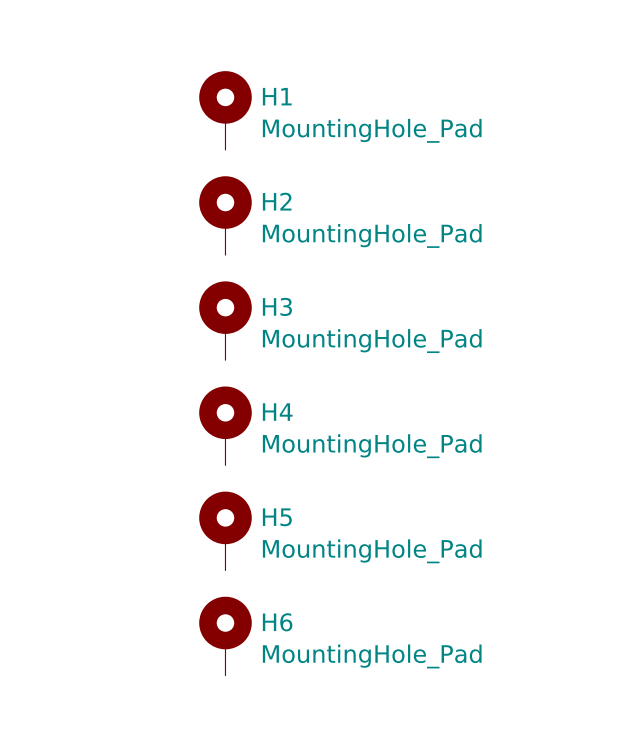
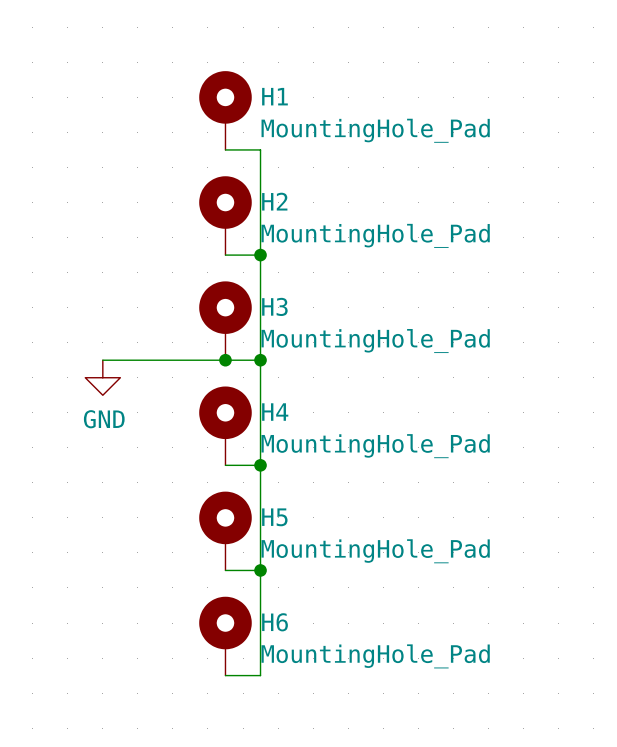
wire: none -> (225, 149) (260, 149) (260, 675) (225, 675)
wire: none -> (225, 255) (260, 255)
junction: none -> (260, 255)
wire: none -> (102, 360) (260, 360)
junction: none -> (225, 360)
junction: none -> (260, 360)
power symbol: none -> GND (102, 377)
wire: none -> (225, 465) (260, 465)
junction: none -> (260, 465)
wire: none -> (225, 570) (260, 570)
junction: none -> (260, 570)

